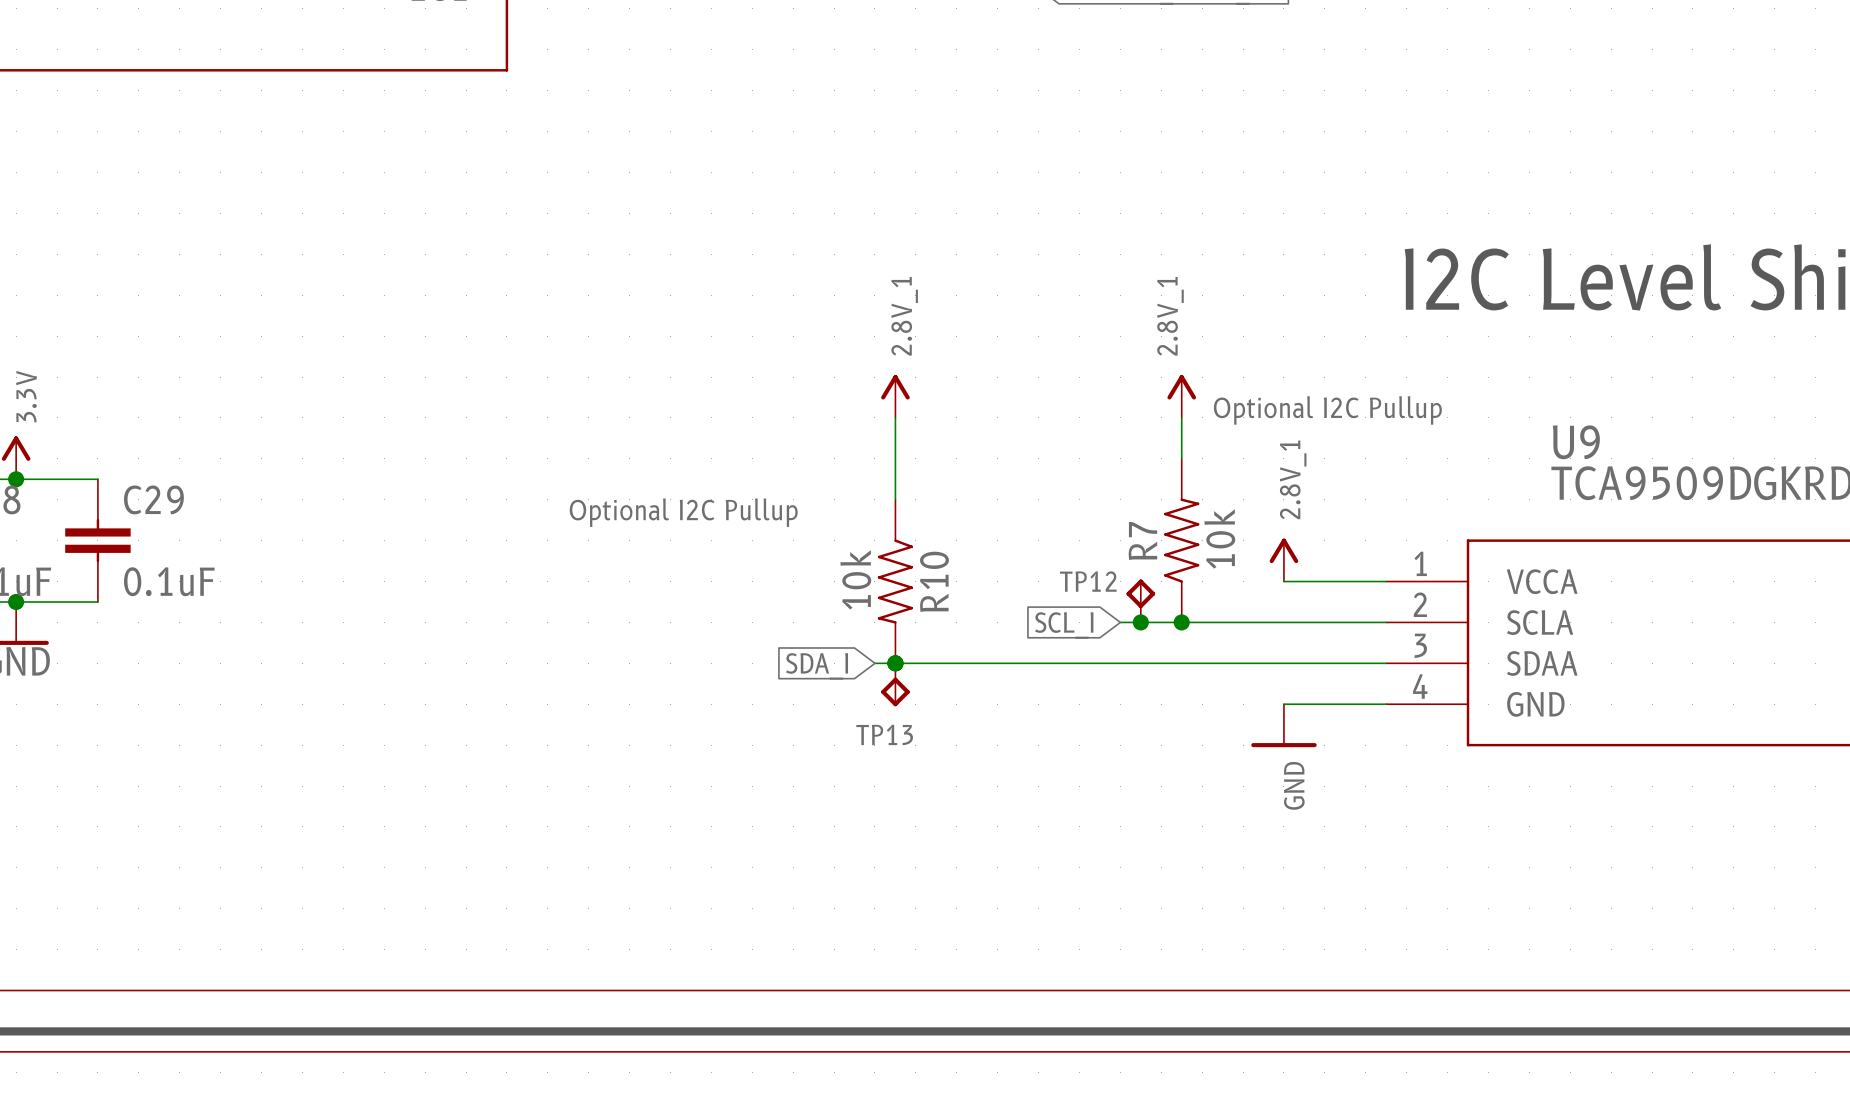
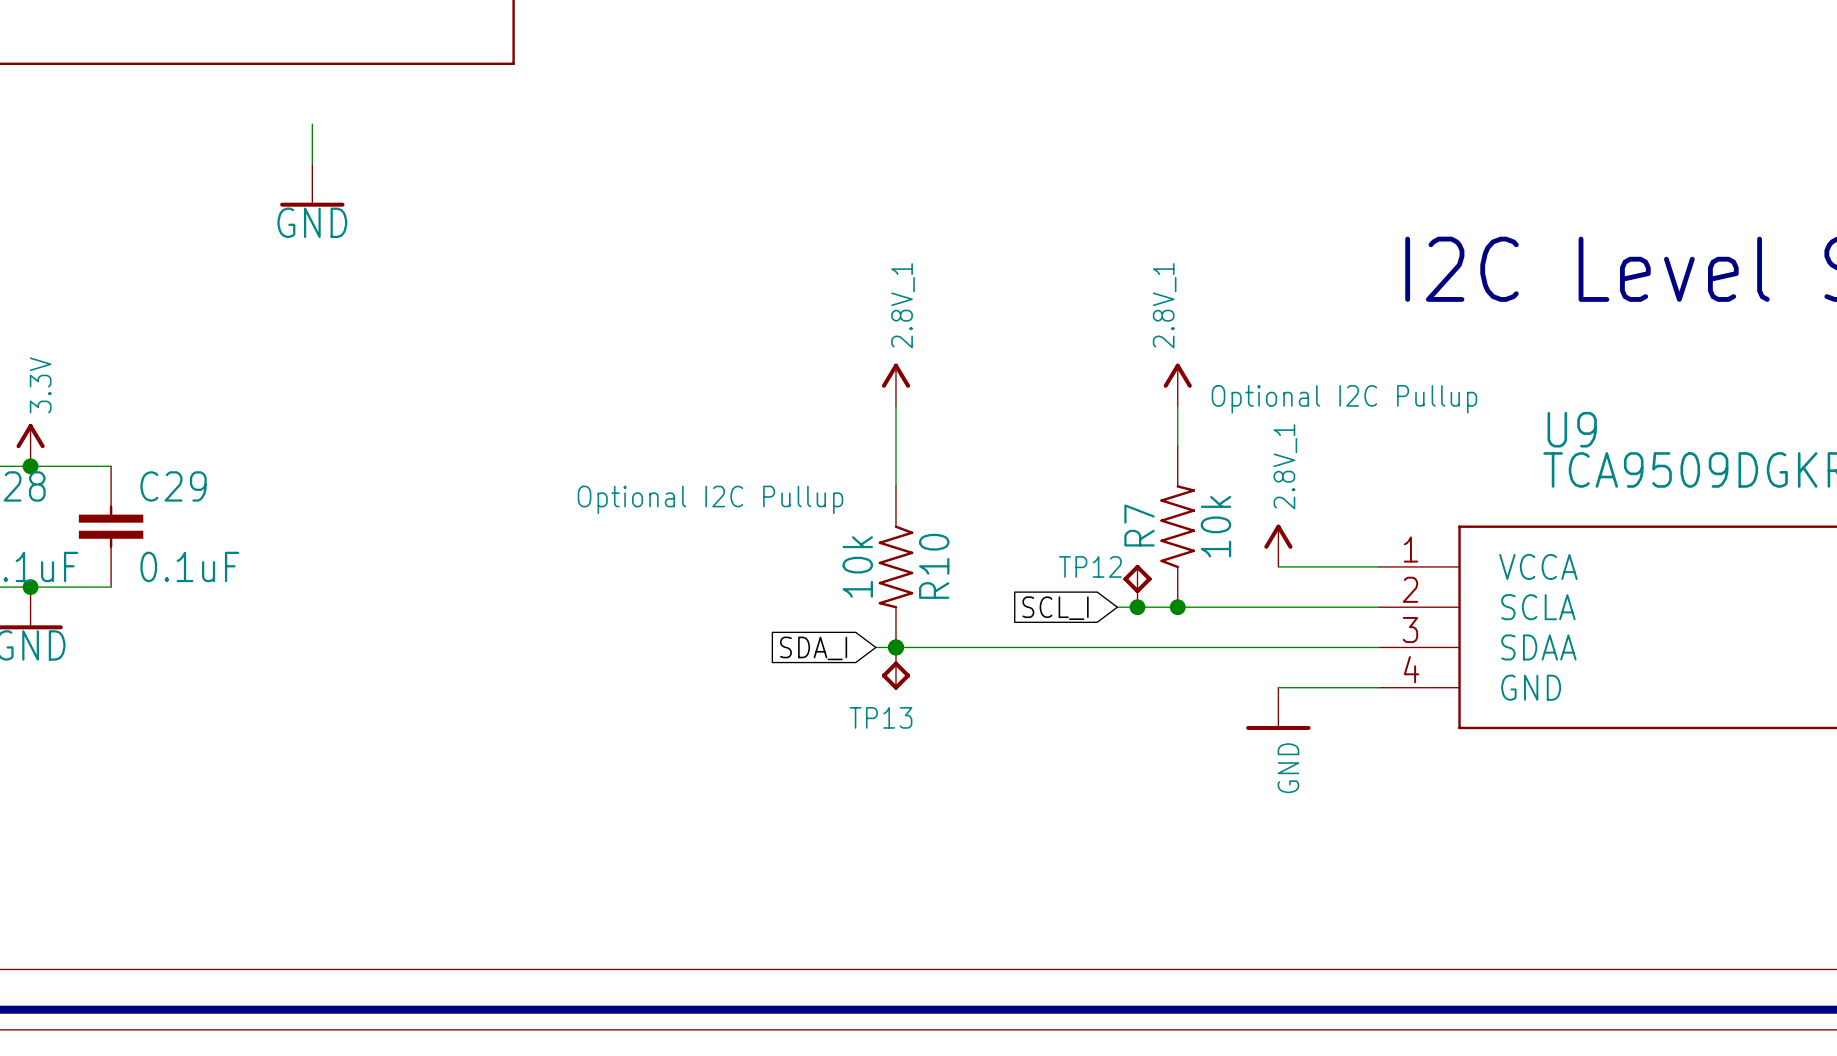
wire: none -> (312, 124) (312, 164)
power symbol: none -> GND (312, 185)

